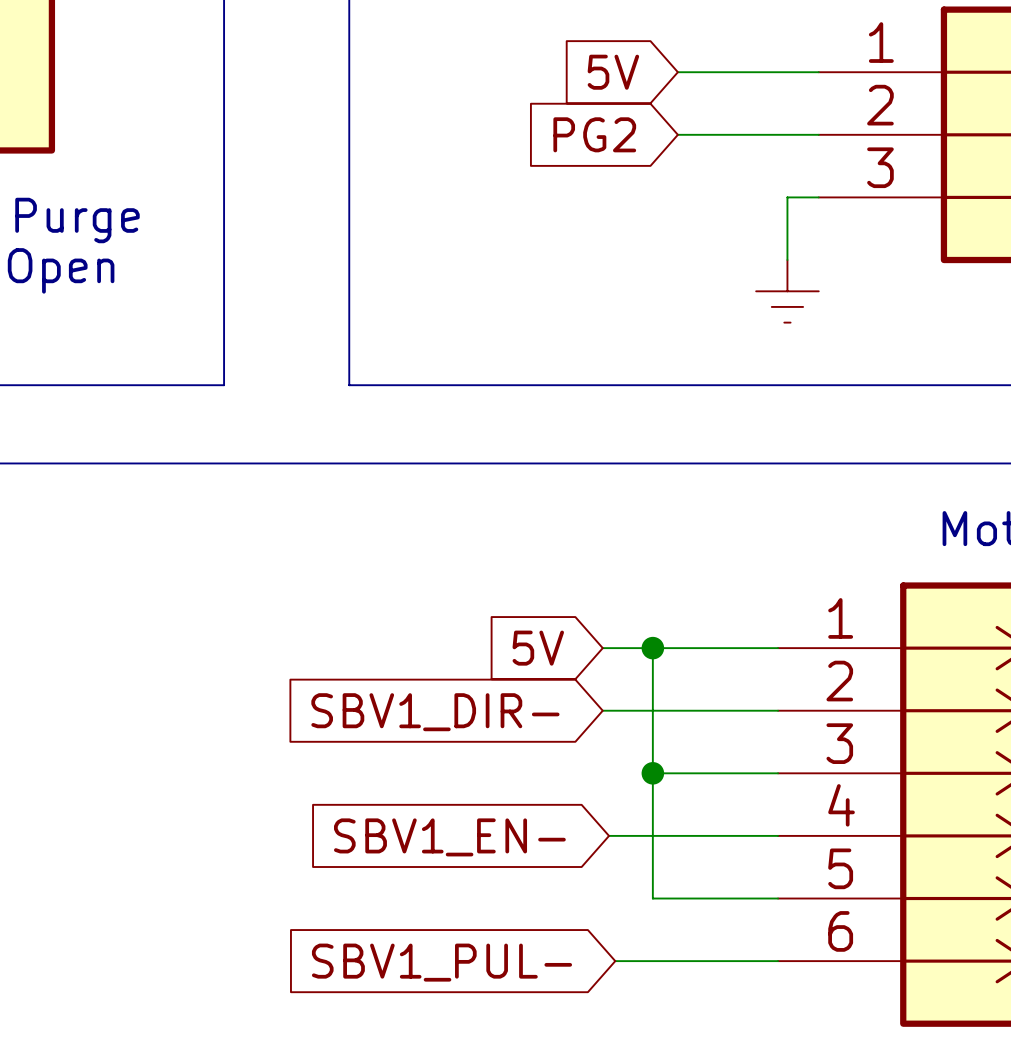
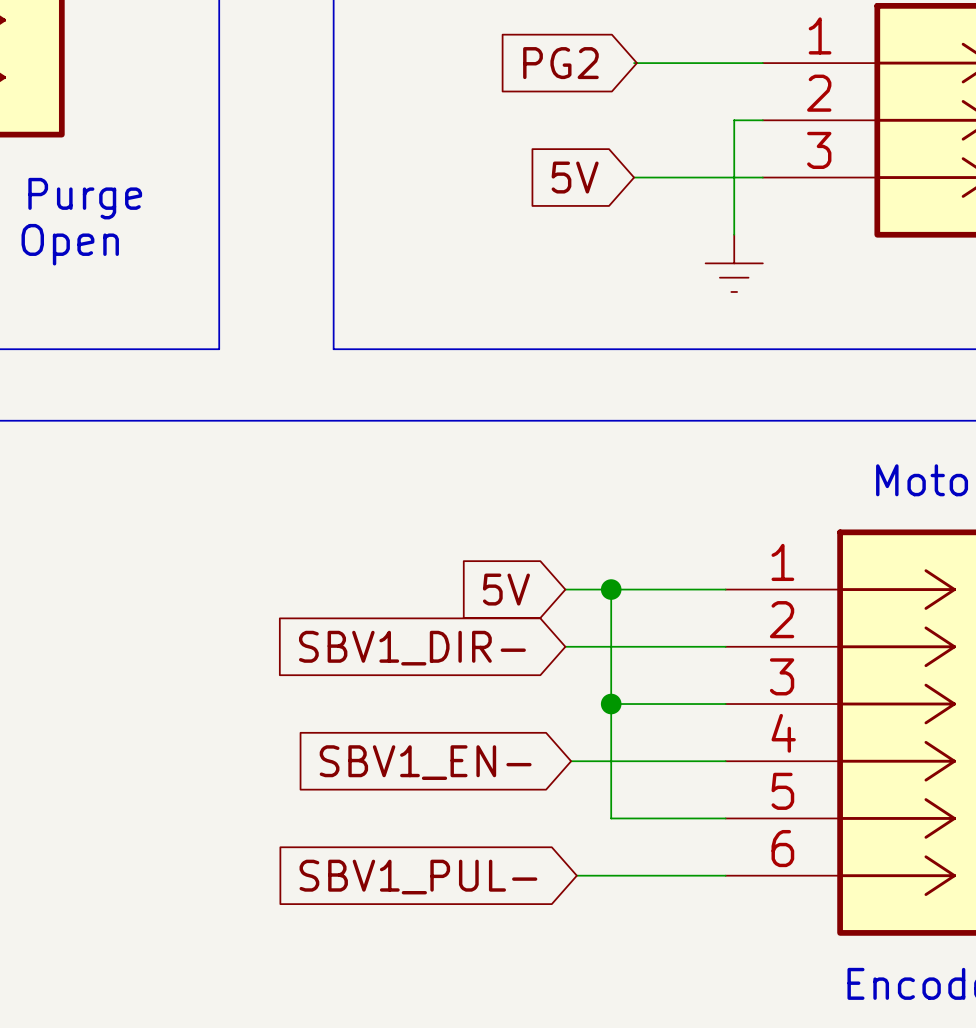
global label position: 5V (613, 72) -> 5V (575, 177)
global label position: PG2 (594, 134) -> PG2 (560, 63)
wire: (677, 134) (787, 134) -> (634, 177) (734, 177) (734, 120)

